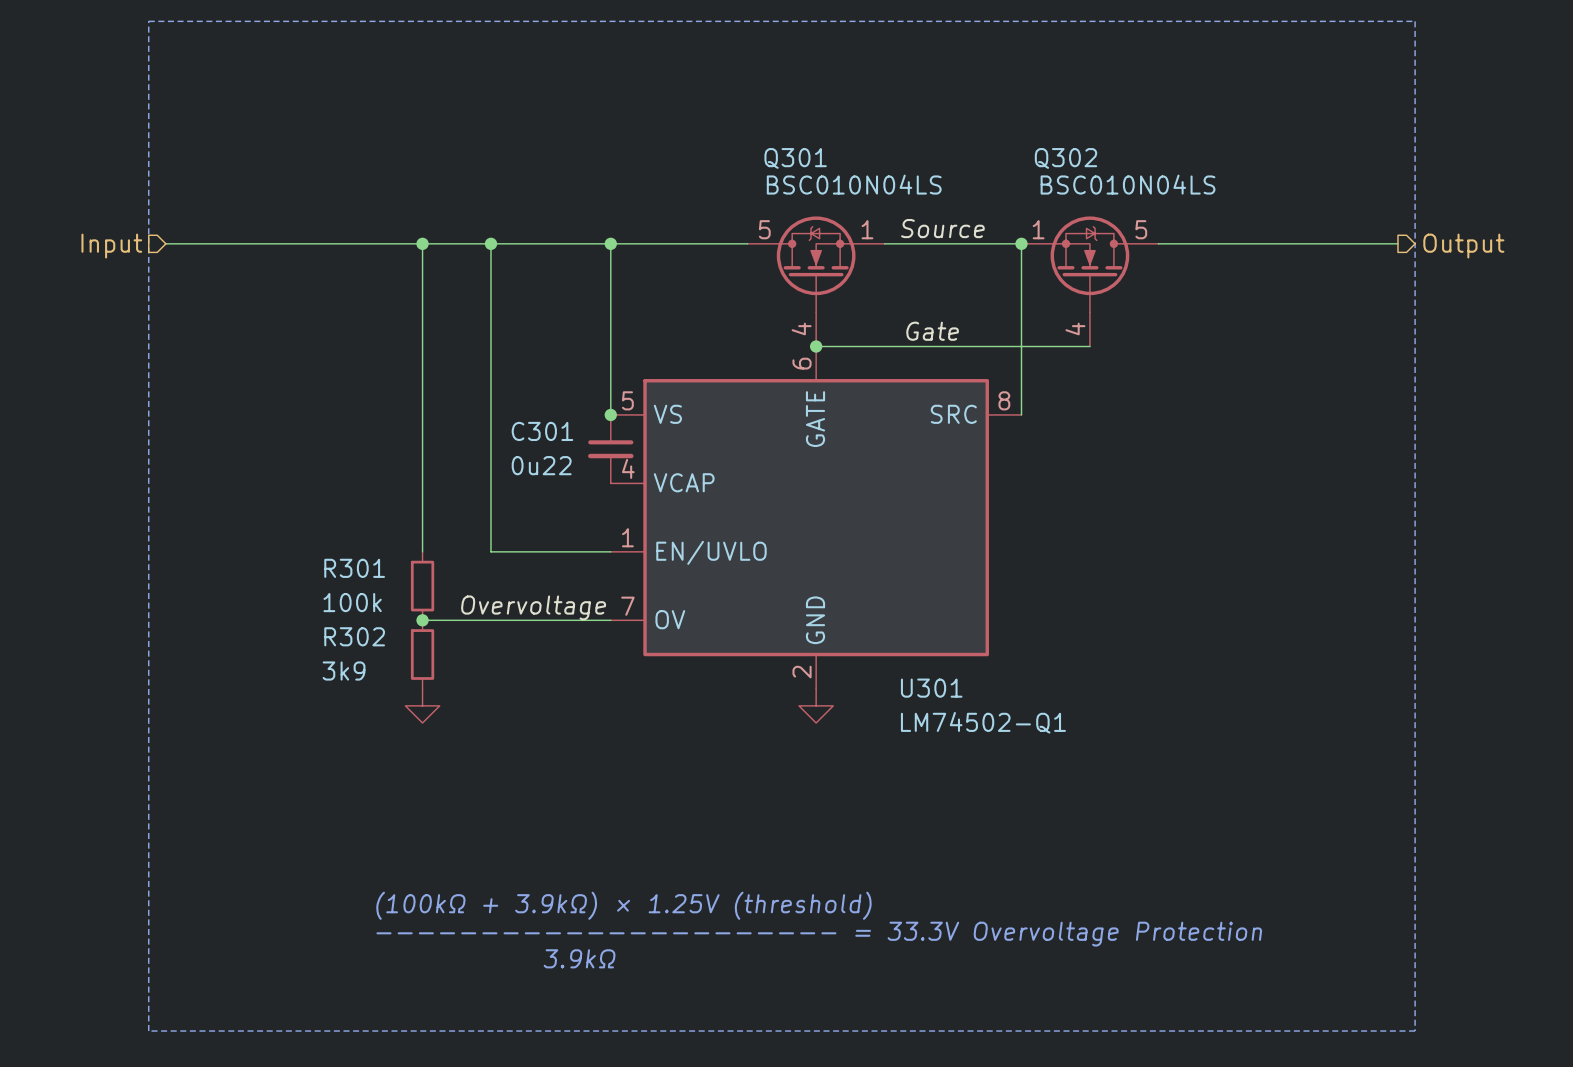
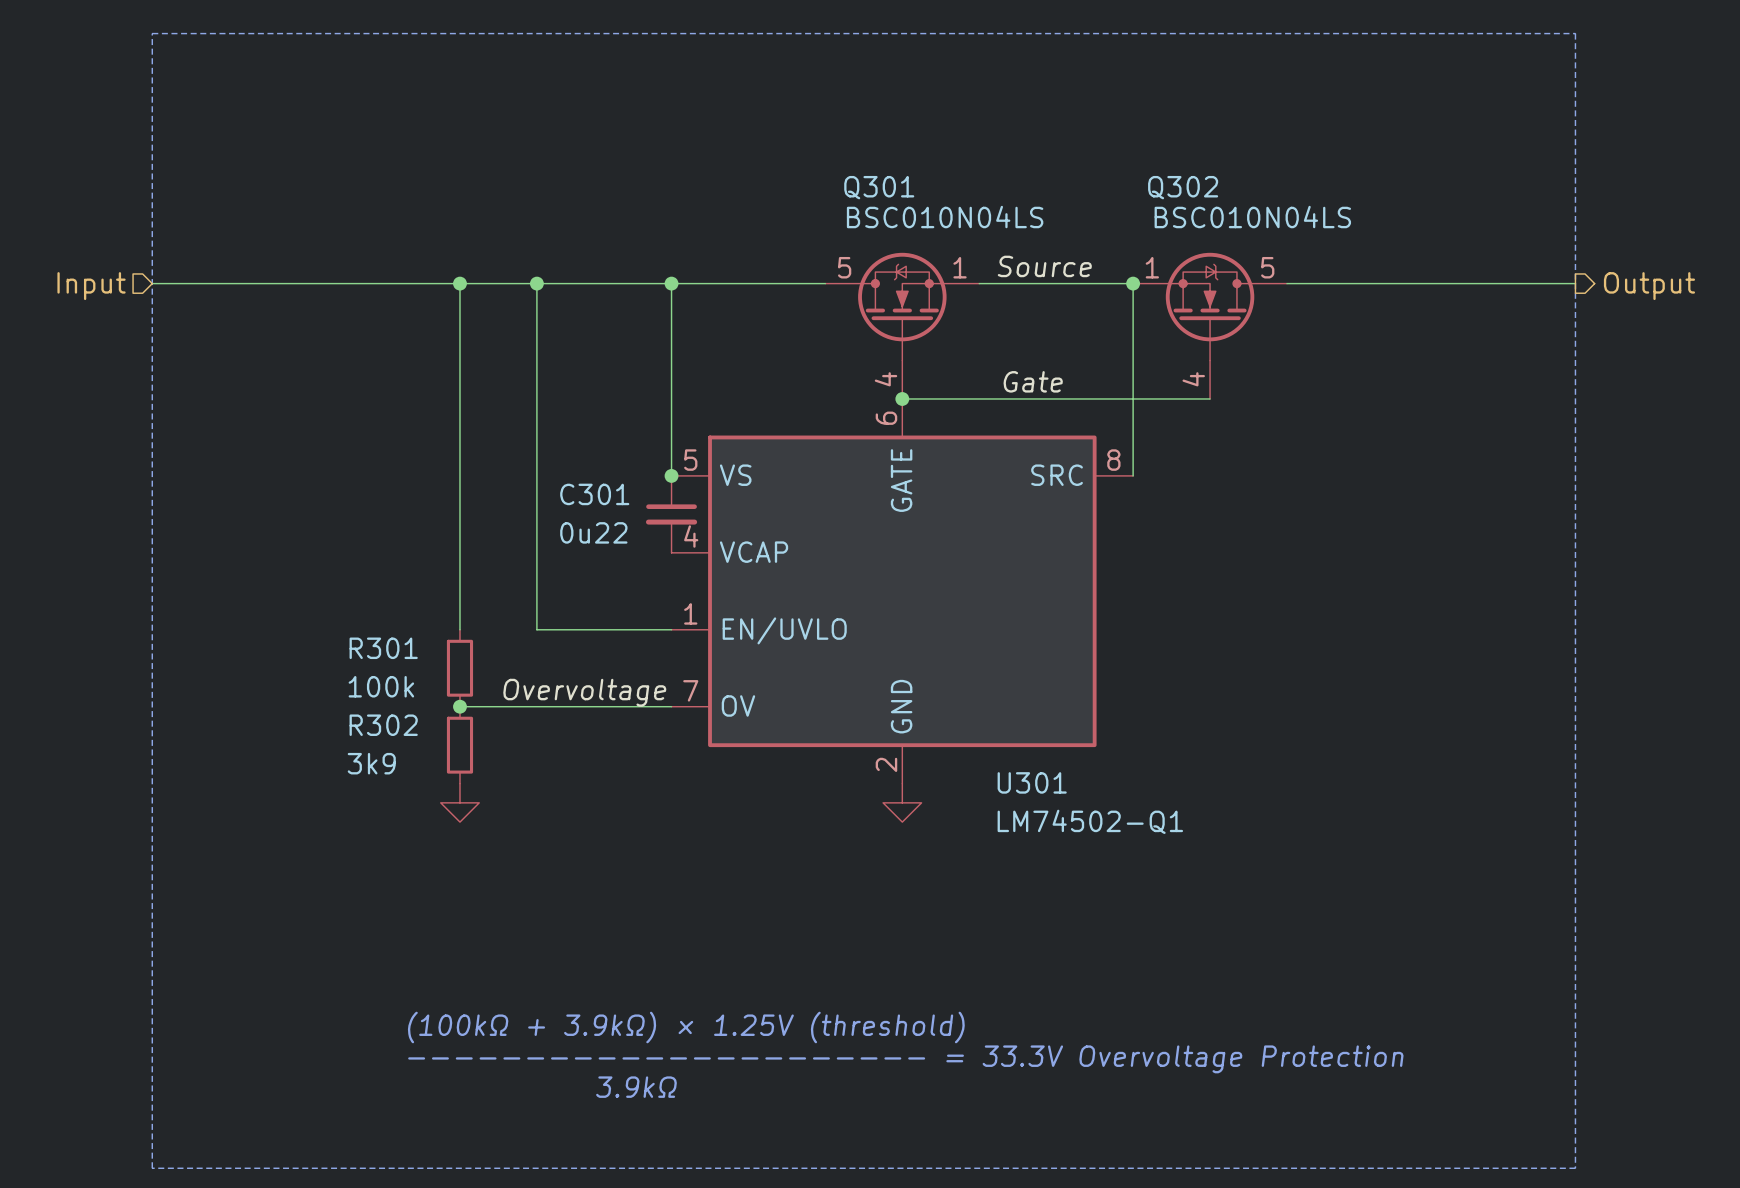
wire: none -> (152, 283) (171, 283)
wire: none -> (1556, 283) (1575, 283)
hierarchical label position: Input (111, 246) -> Input (91, 286)
hierarchical label position: Output (1463, 246) -> Output (1649, 286)

